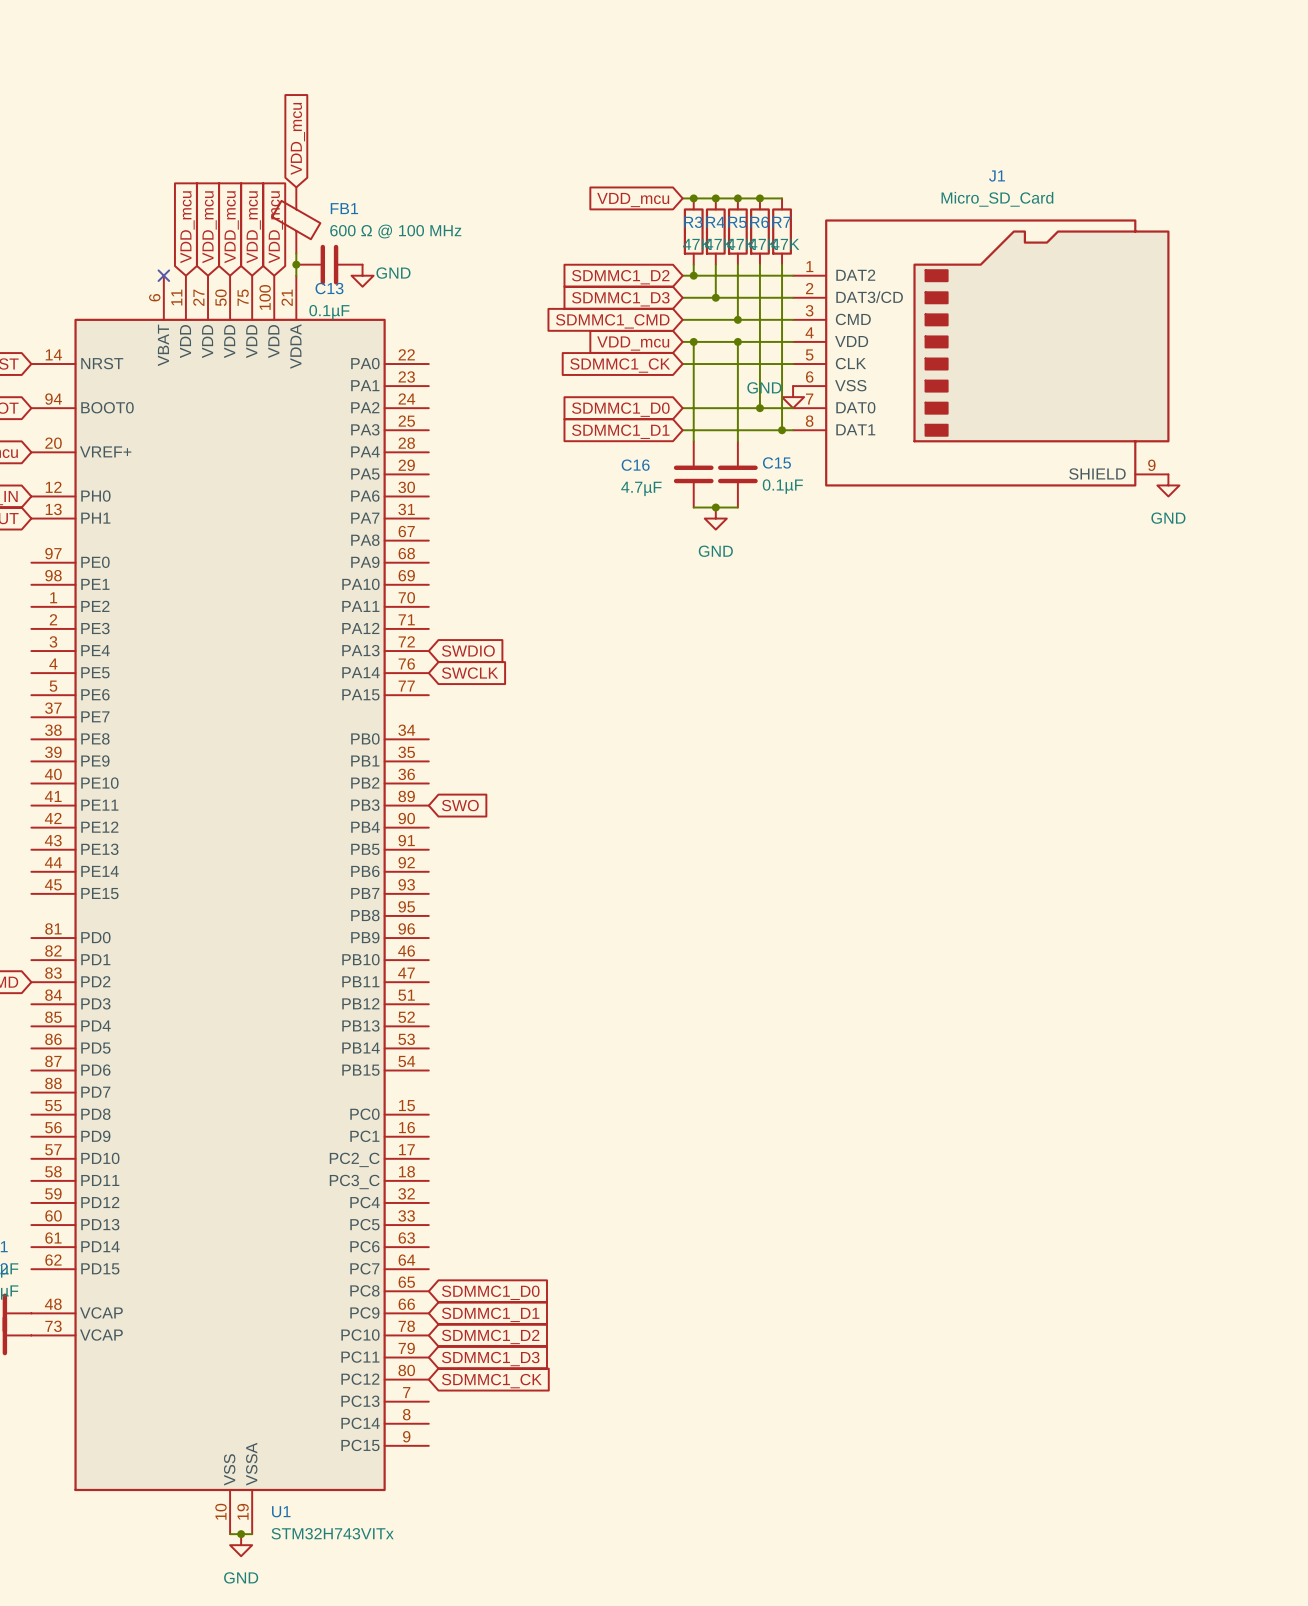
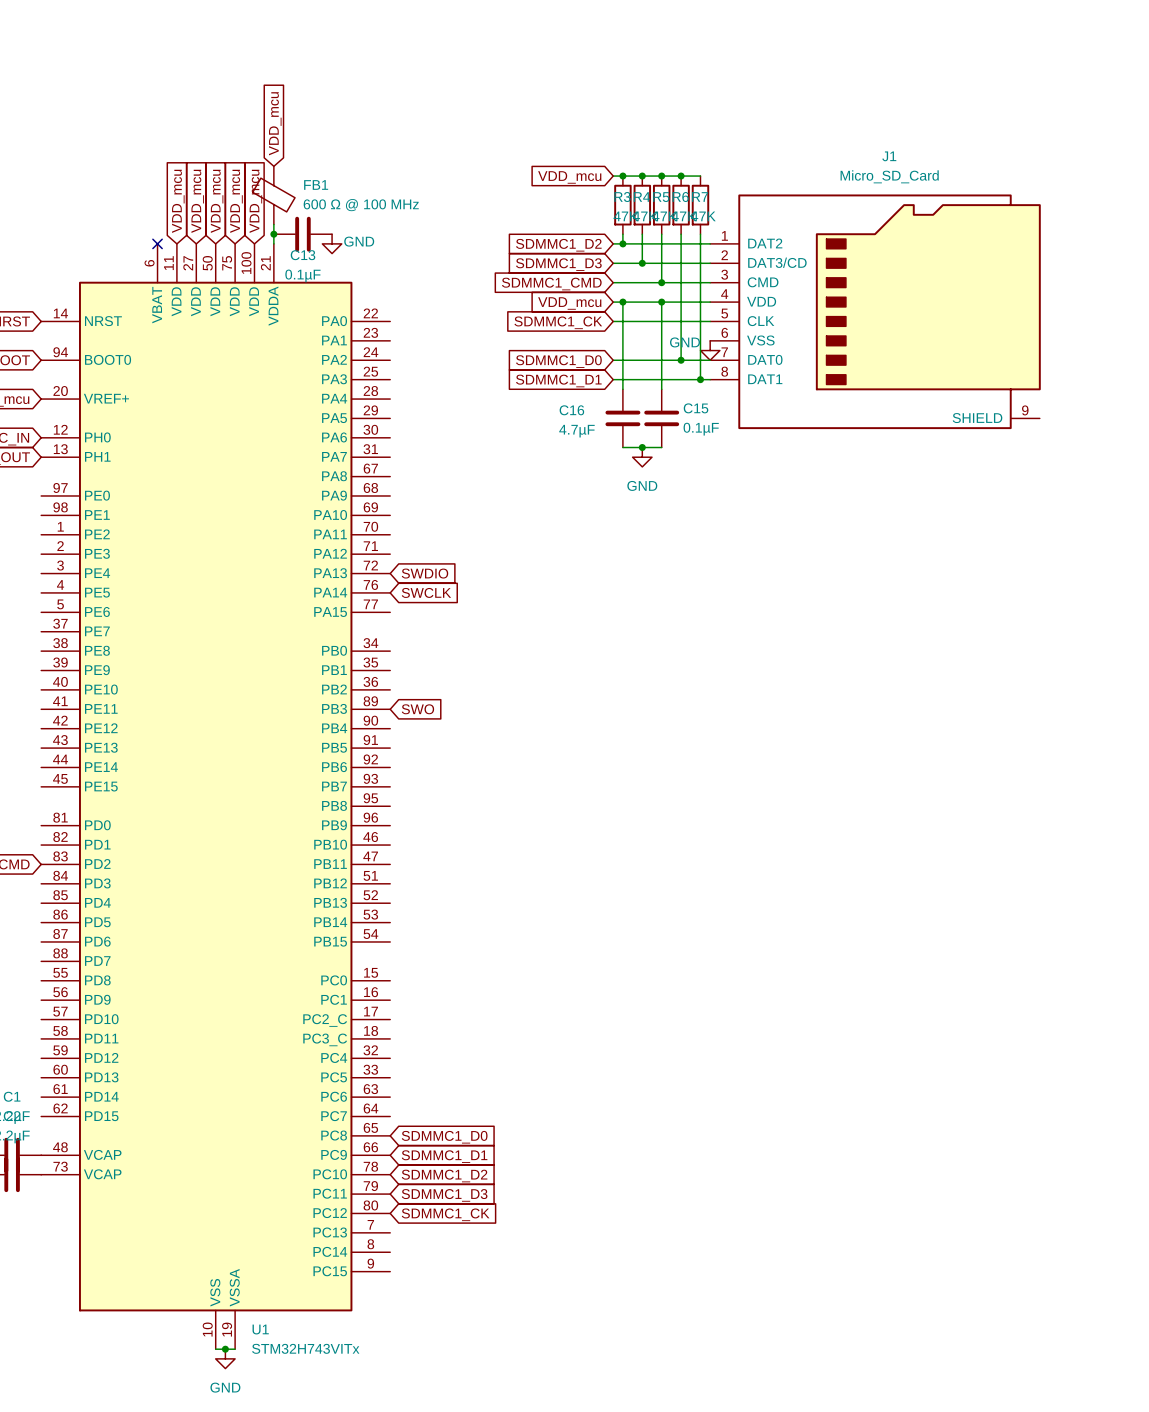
power symbol: GND (1168, 485) -> none

